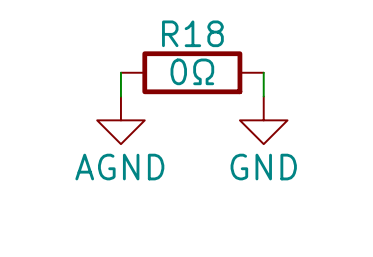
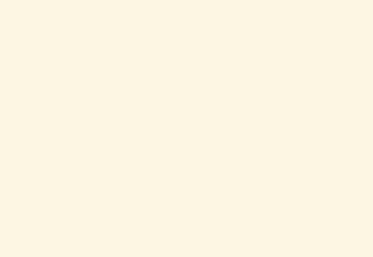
wire: (120, 72) (120, 96) -> none
R18: 0Ω (192, 72) -> none
wire: (263, 72) (263, 96) -> none
power symbol: AGND (120, 120) -> none
power symbol: GND (263, 120) -> none

